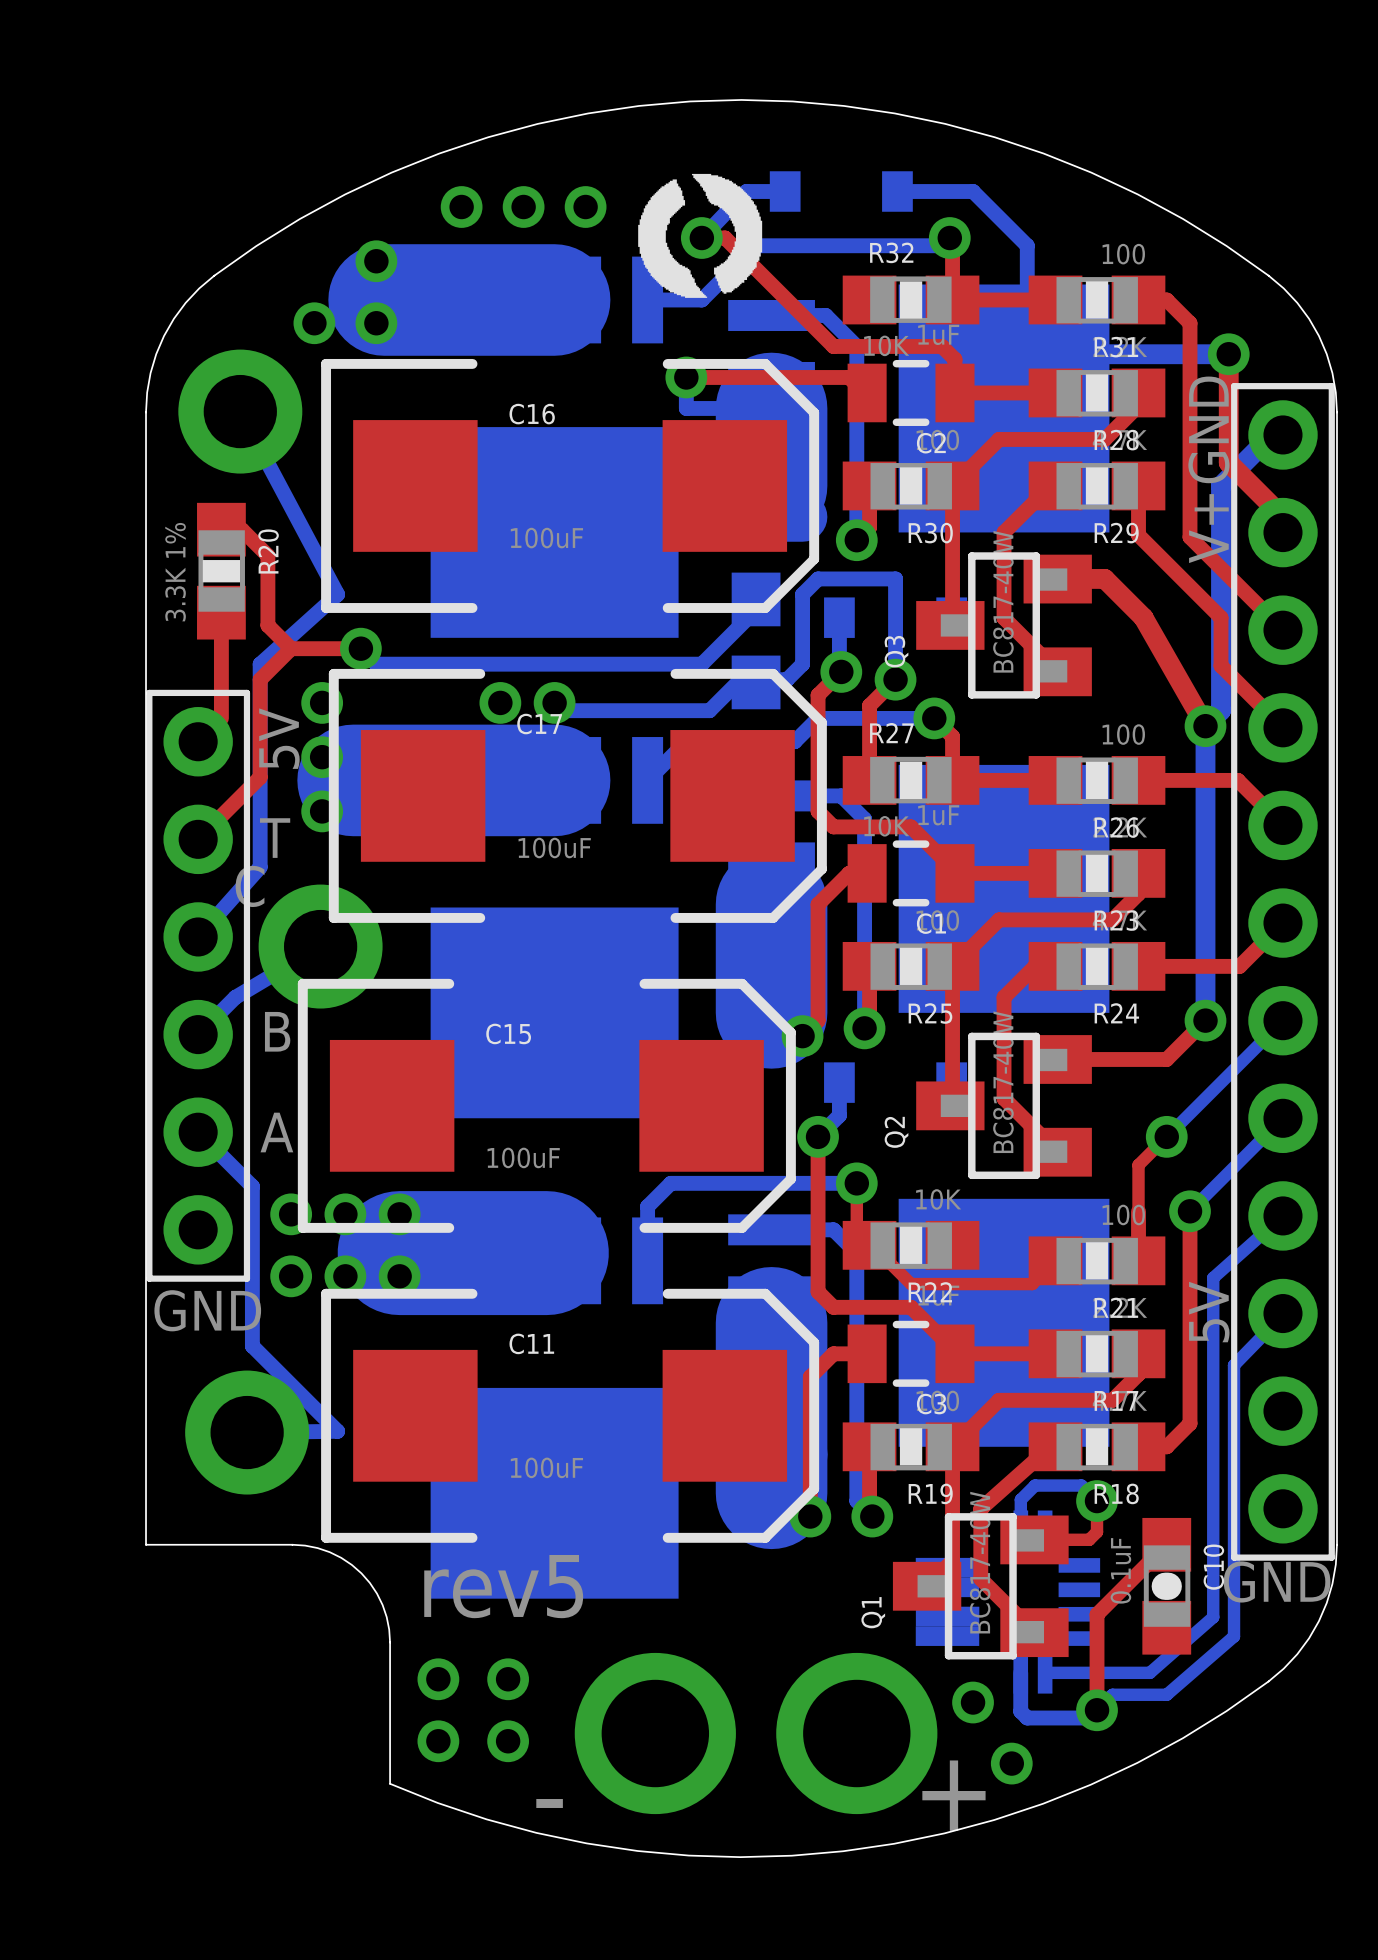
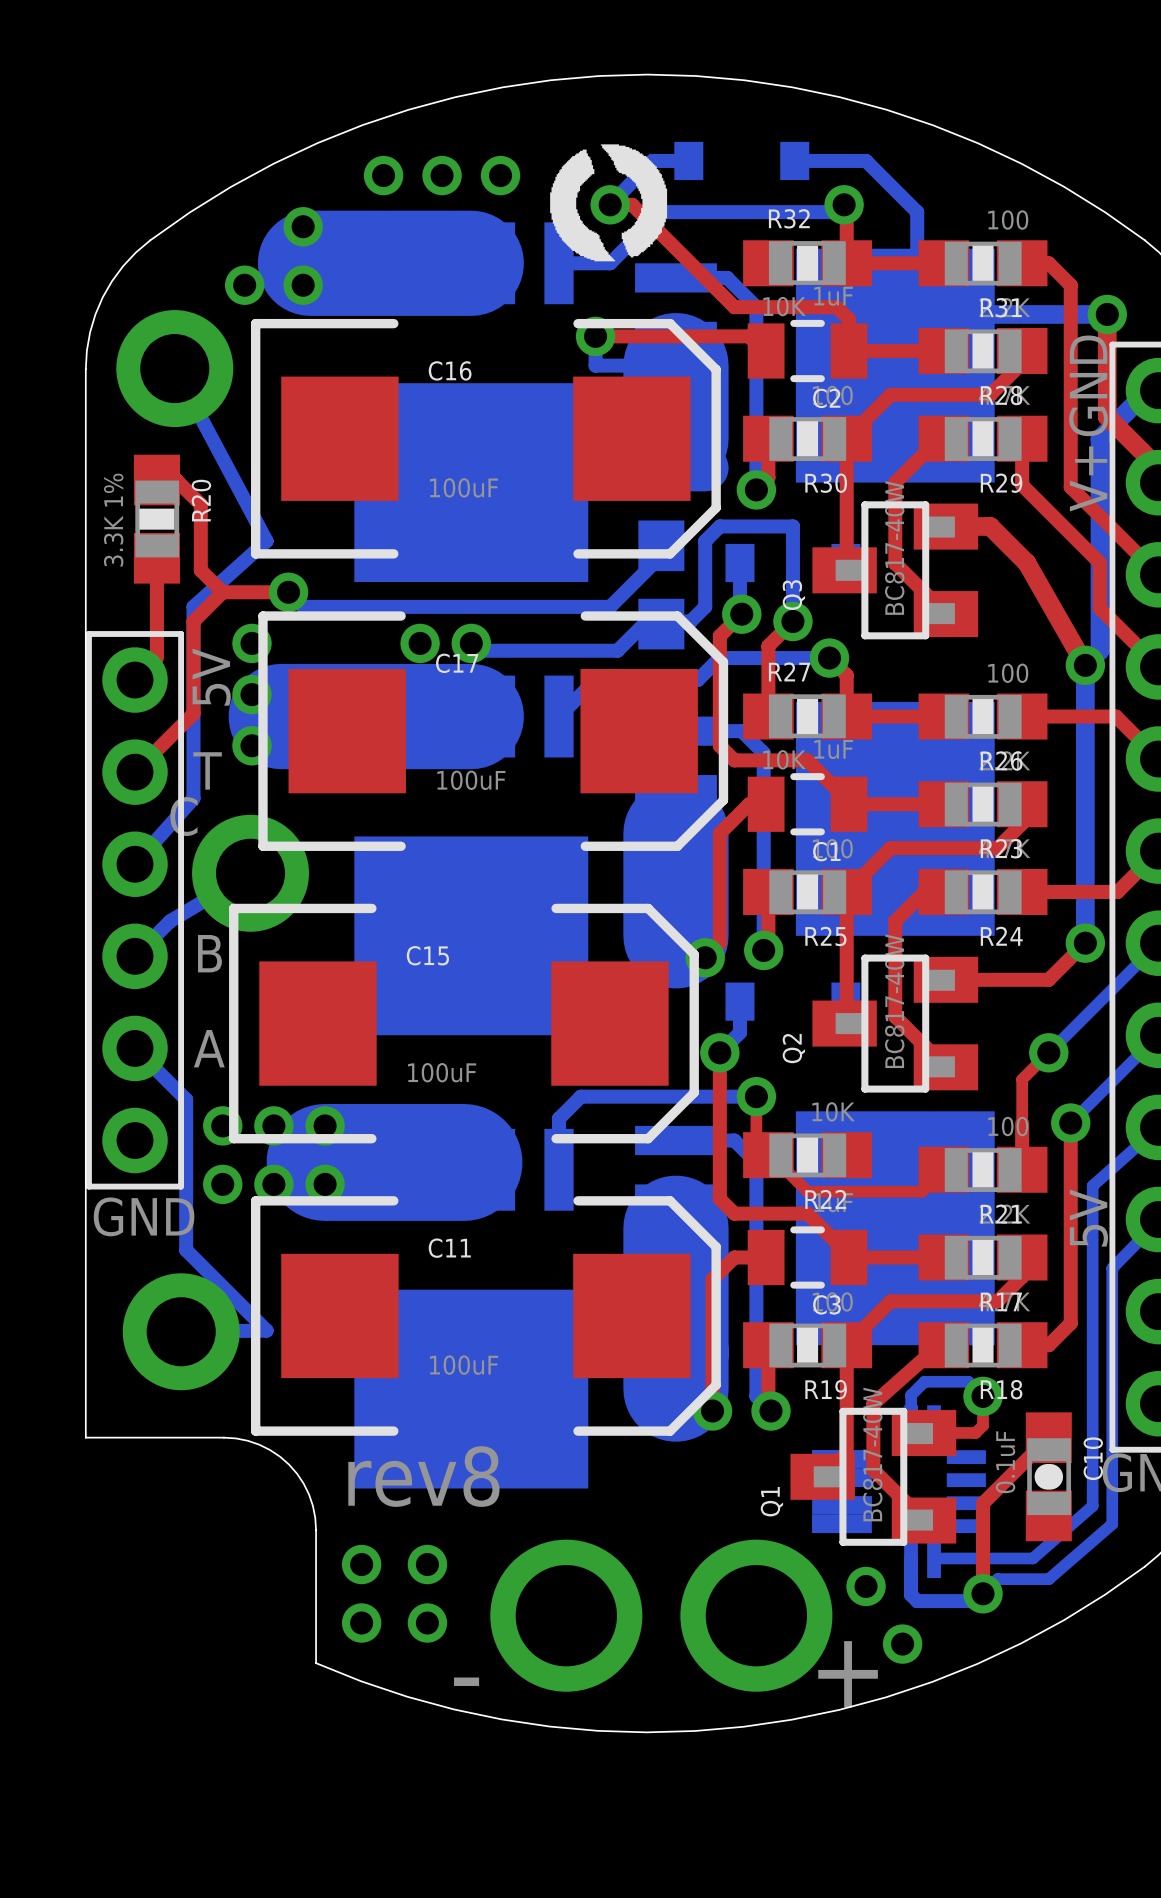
text: rev5 (503, 1586) -> rev8 (423, 1476)

